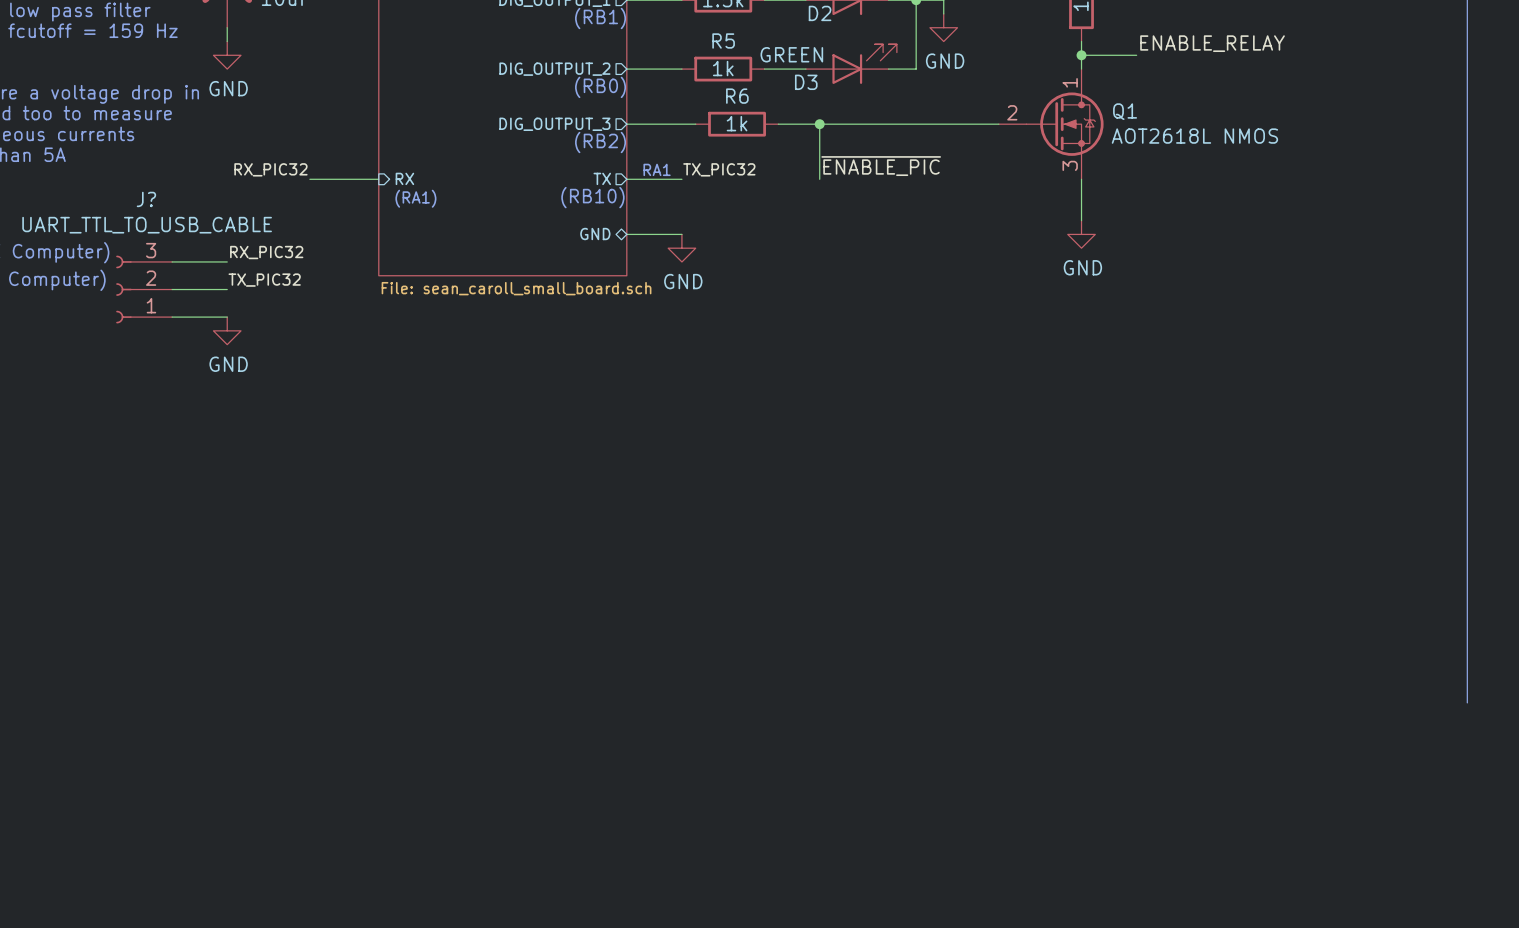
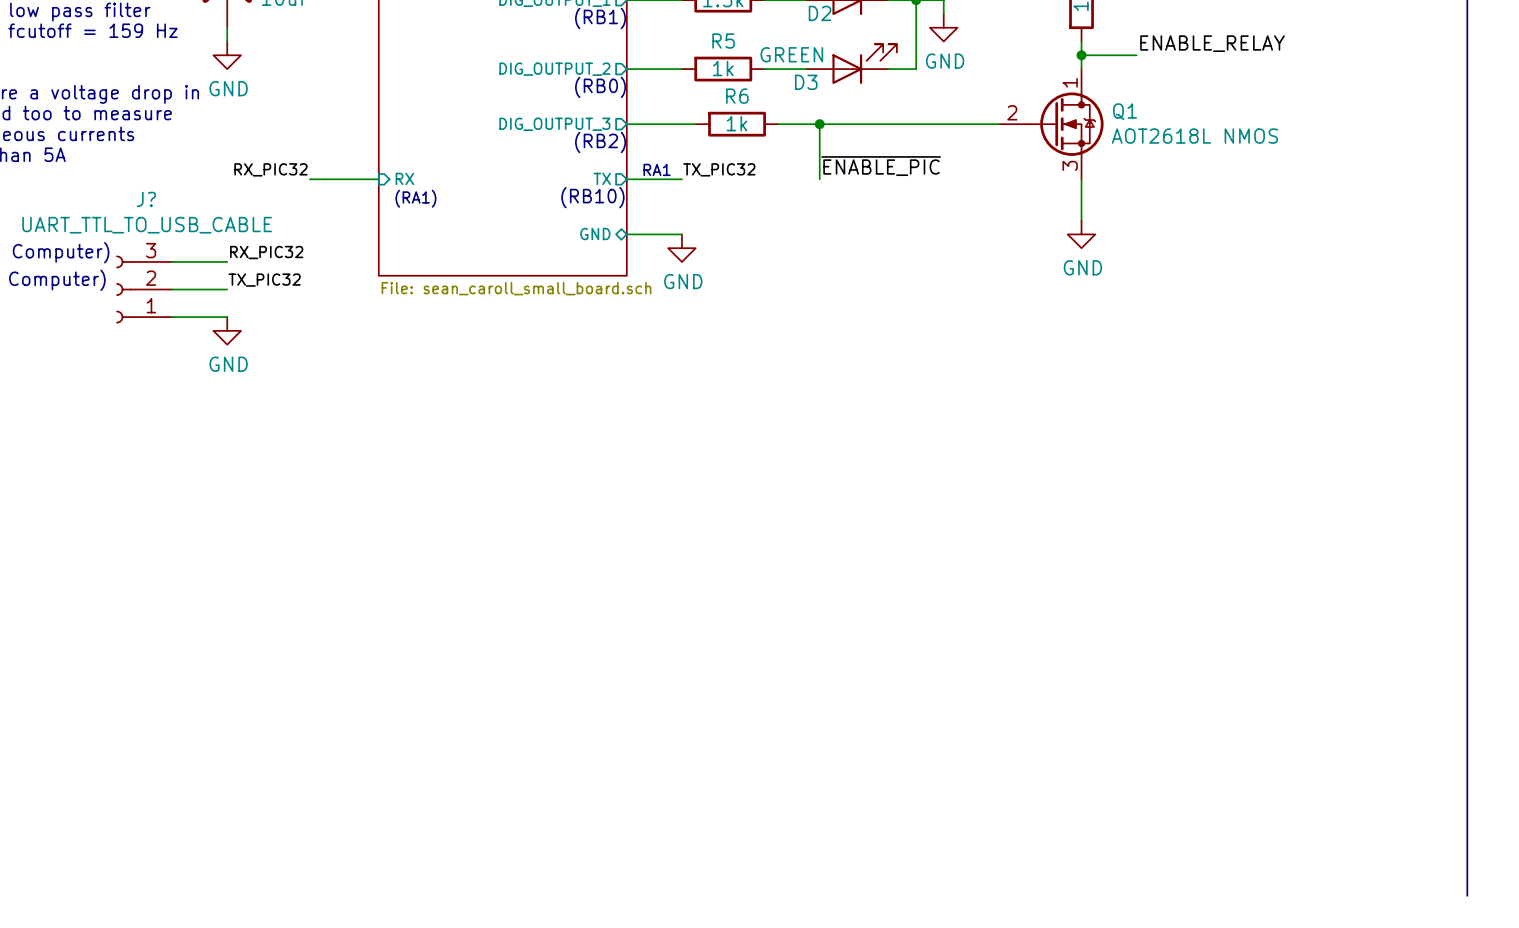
bus: none -> (1467, 702) (1467, 895)

